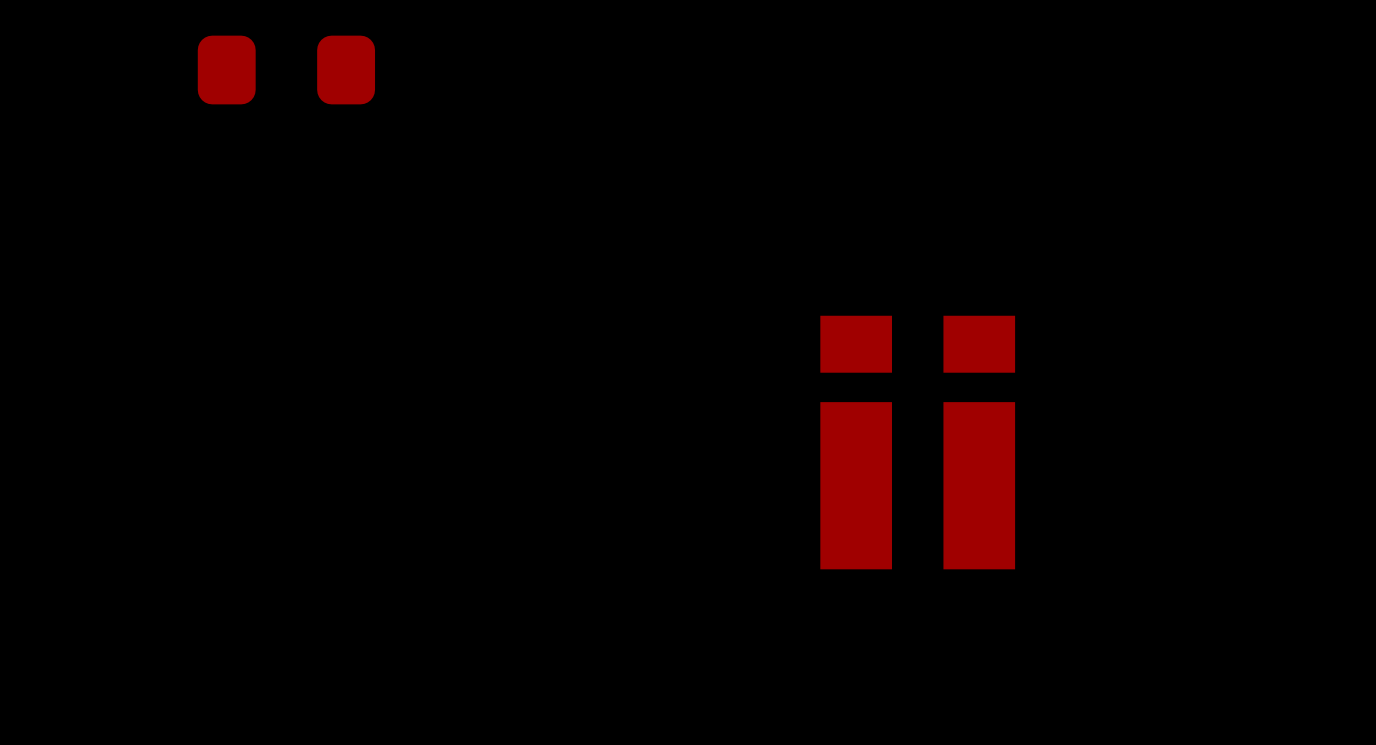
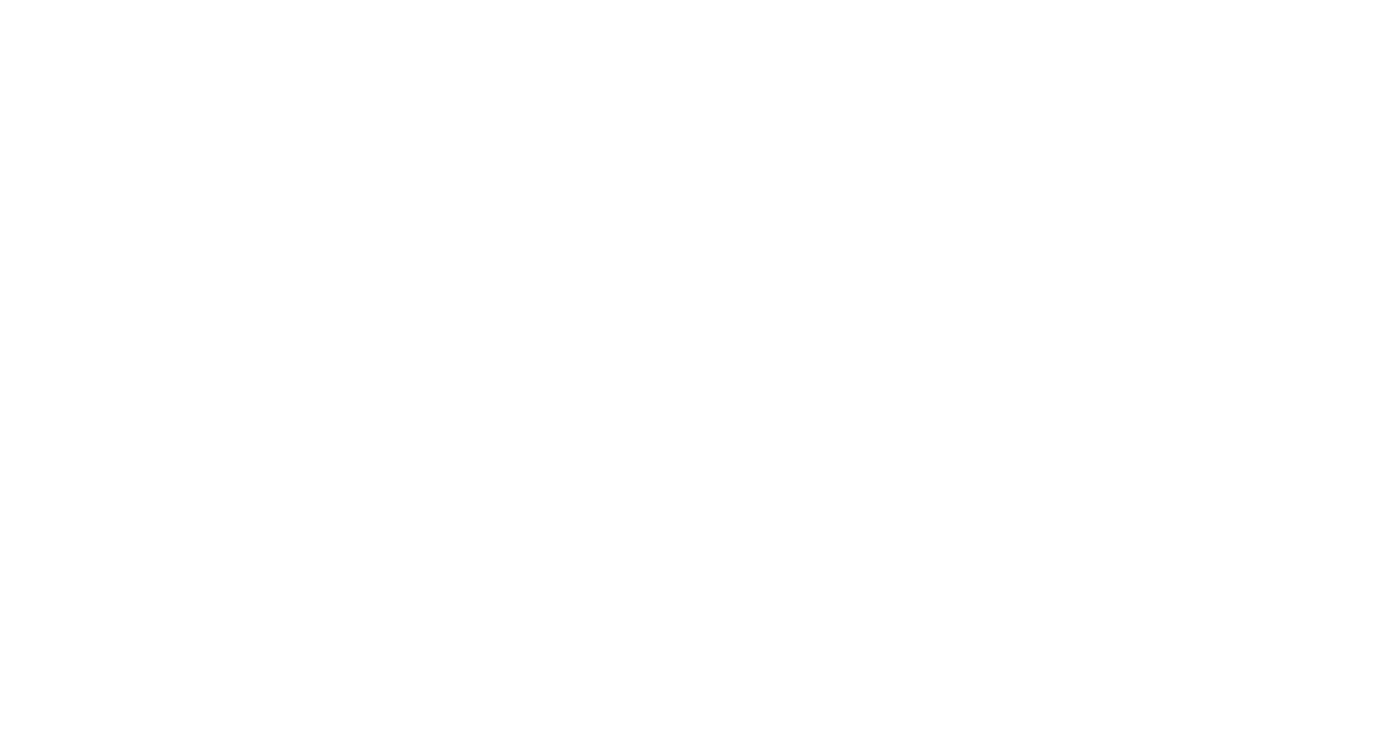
part: (286, 70) -> none
part: (917, 442) -> none

